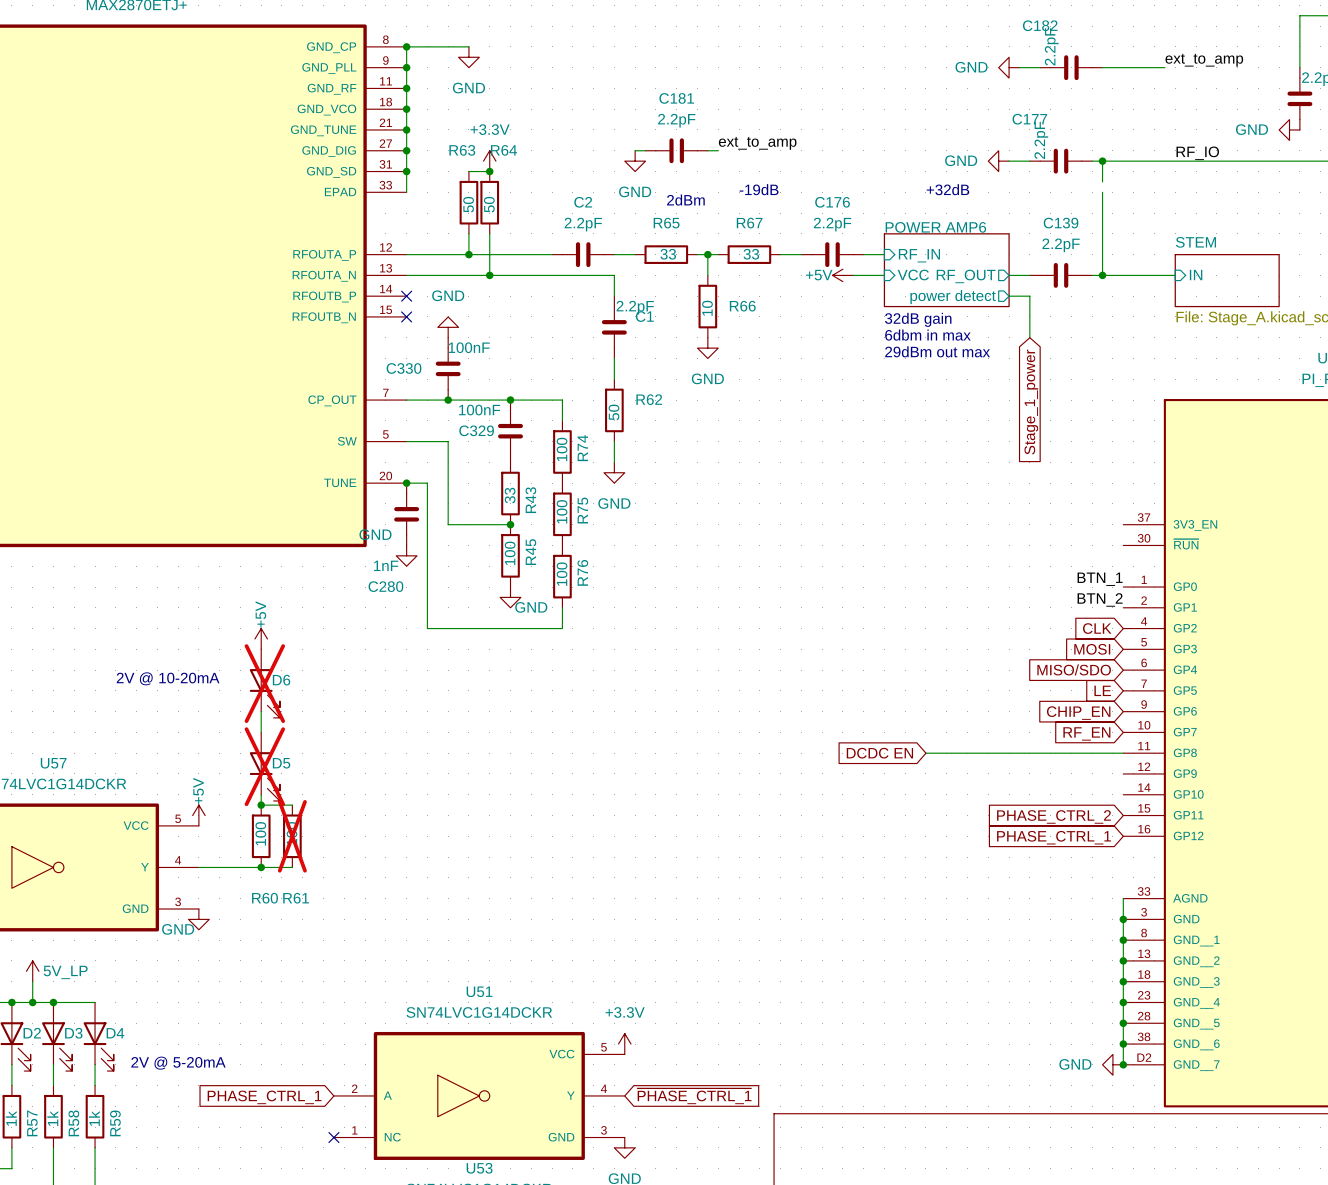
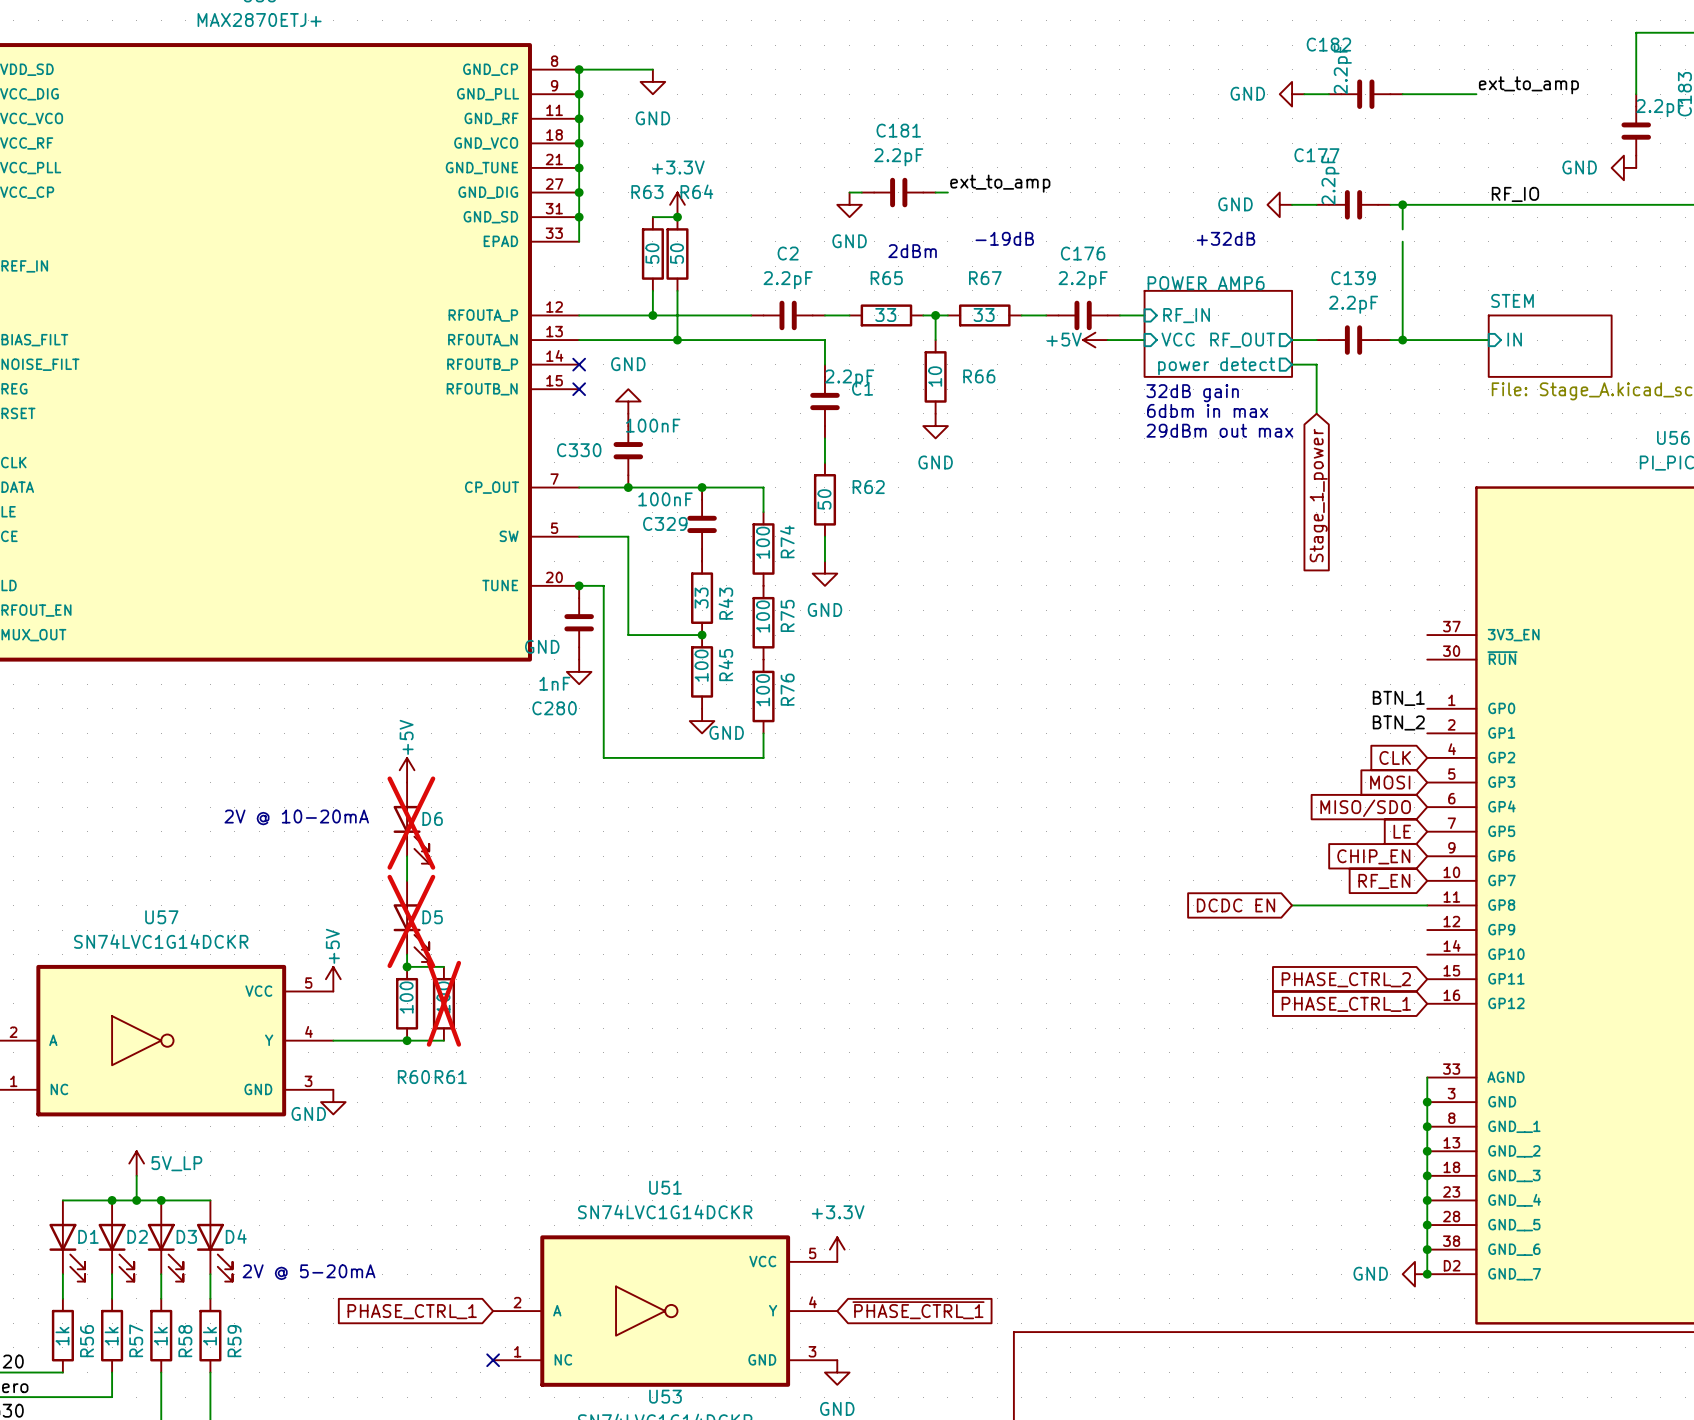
global label position: DCDC EN (879, 753) -> DCDC EN (1236, 905)
wire: (925, 753) (1009, 753) -> none

